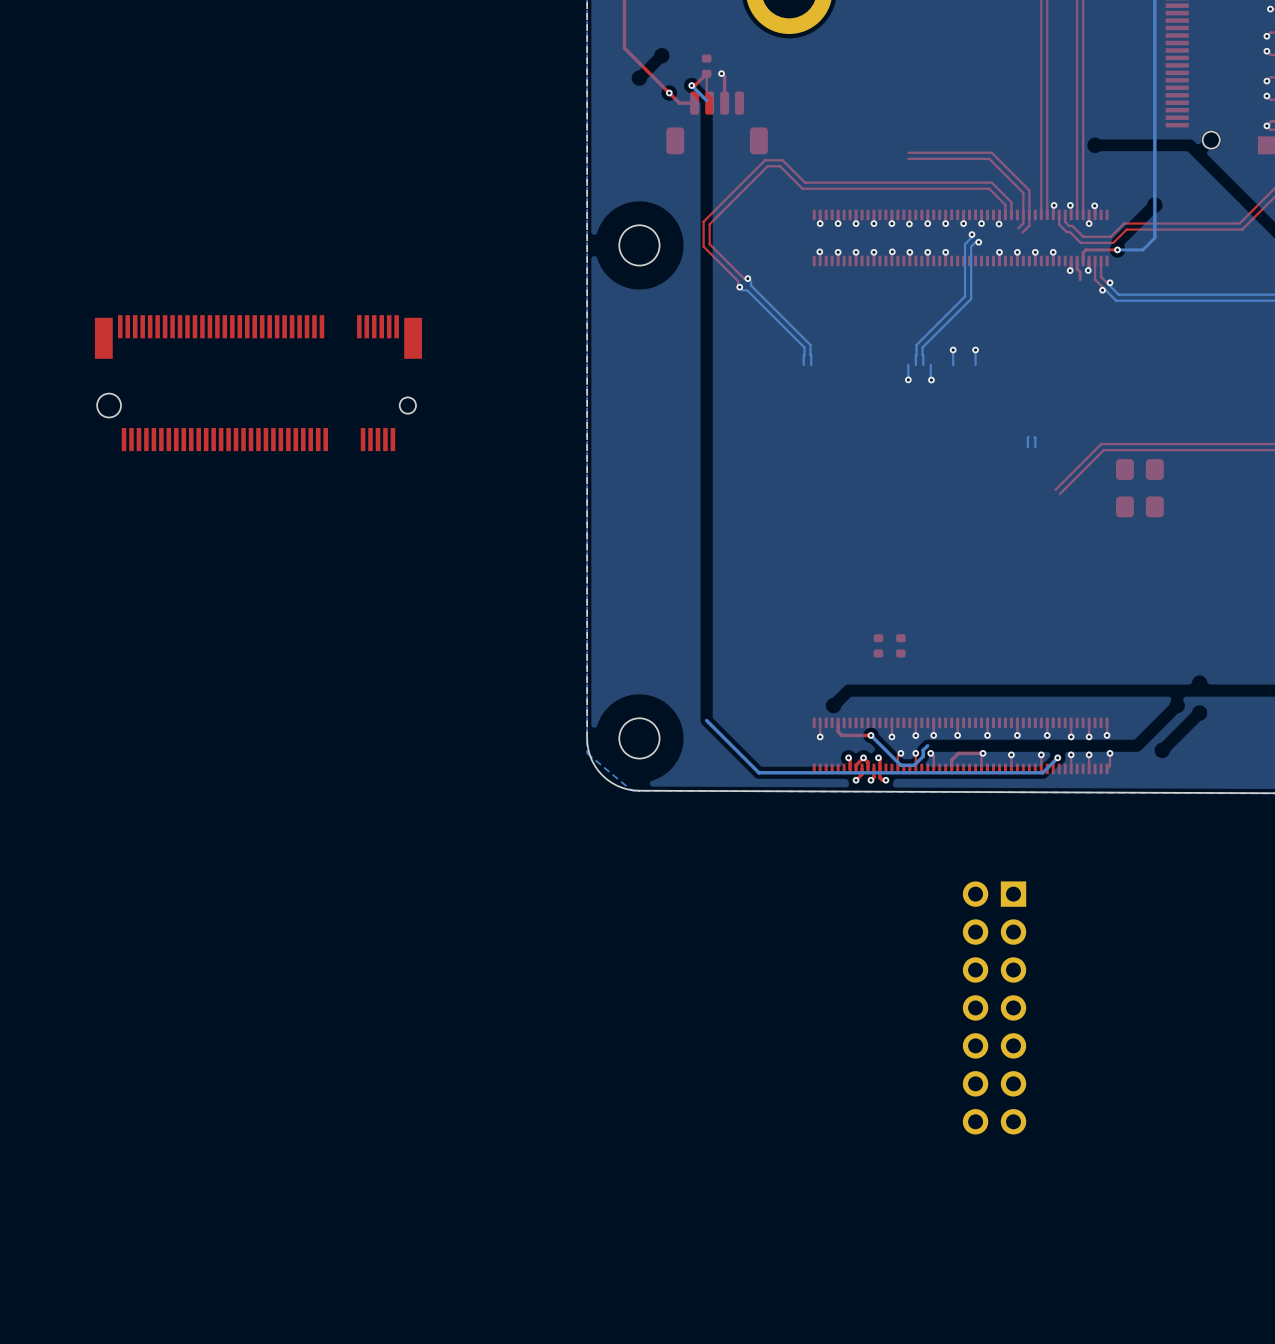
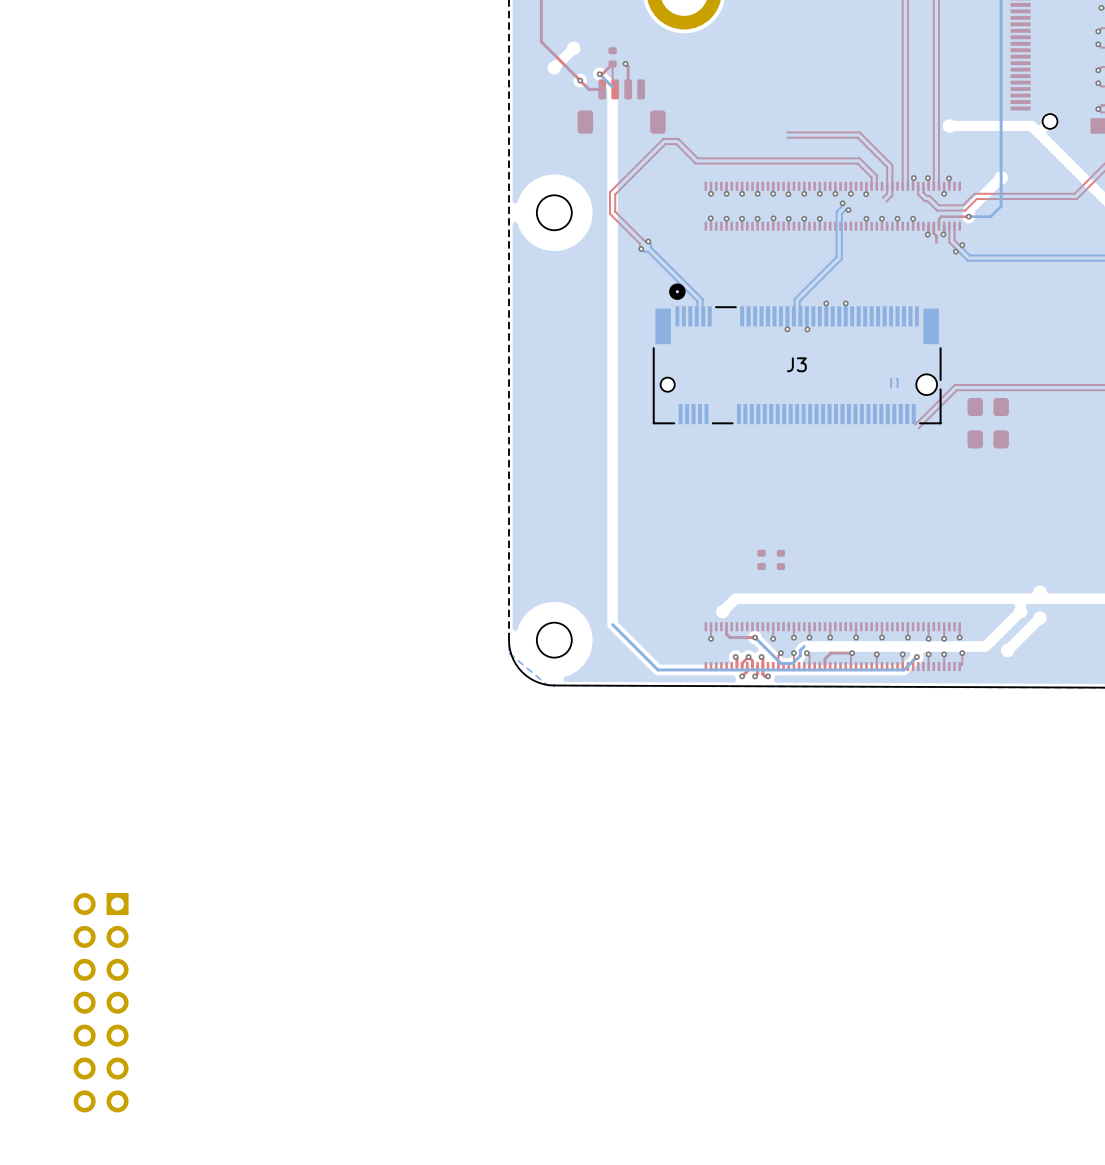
part: (258, 383) -> none
J3: none -> (797, 353)
part: (994, 1007) -> none
part: none -> (101, 1002)

